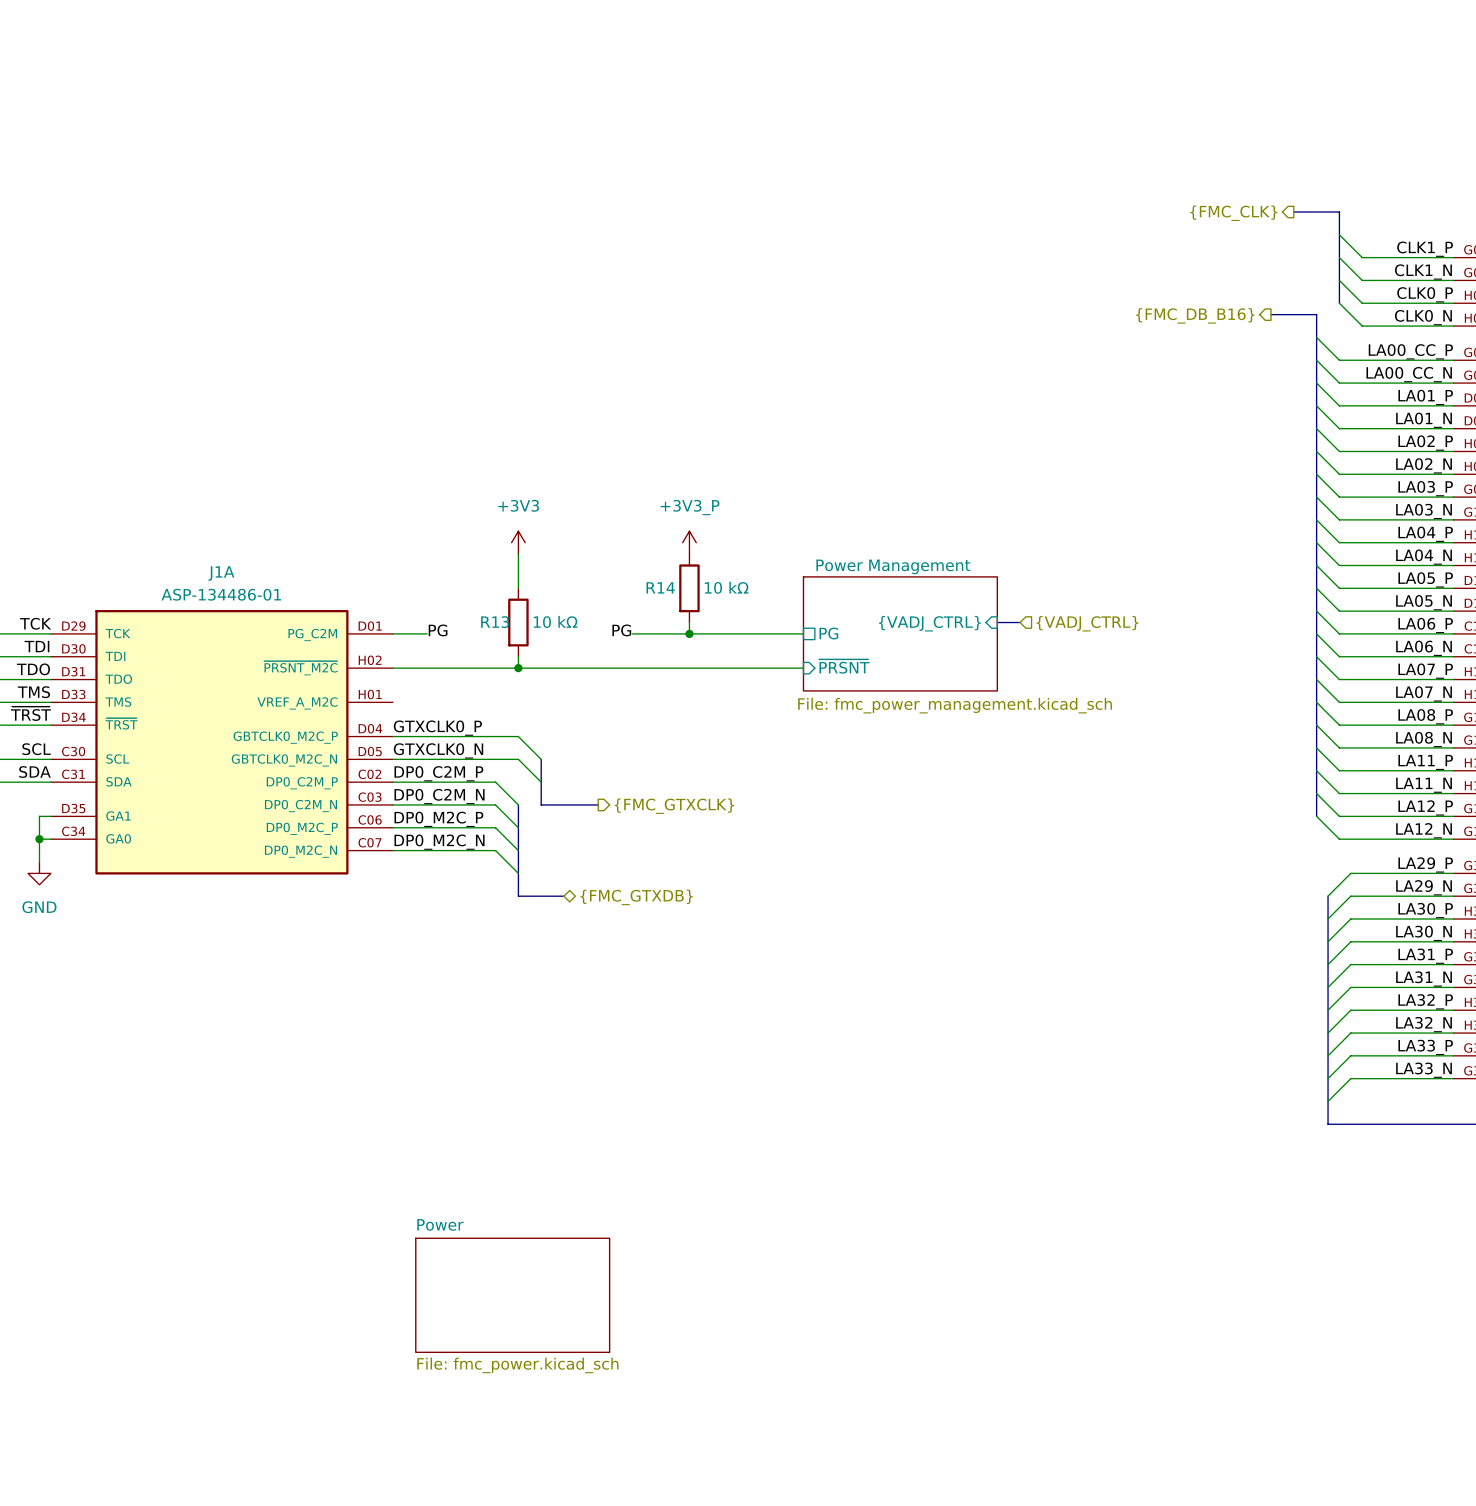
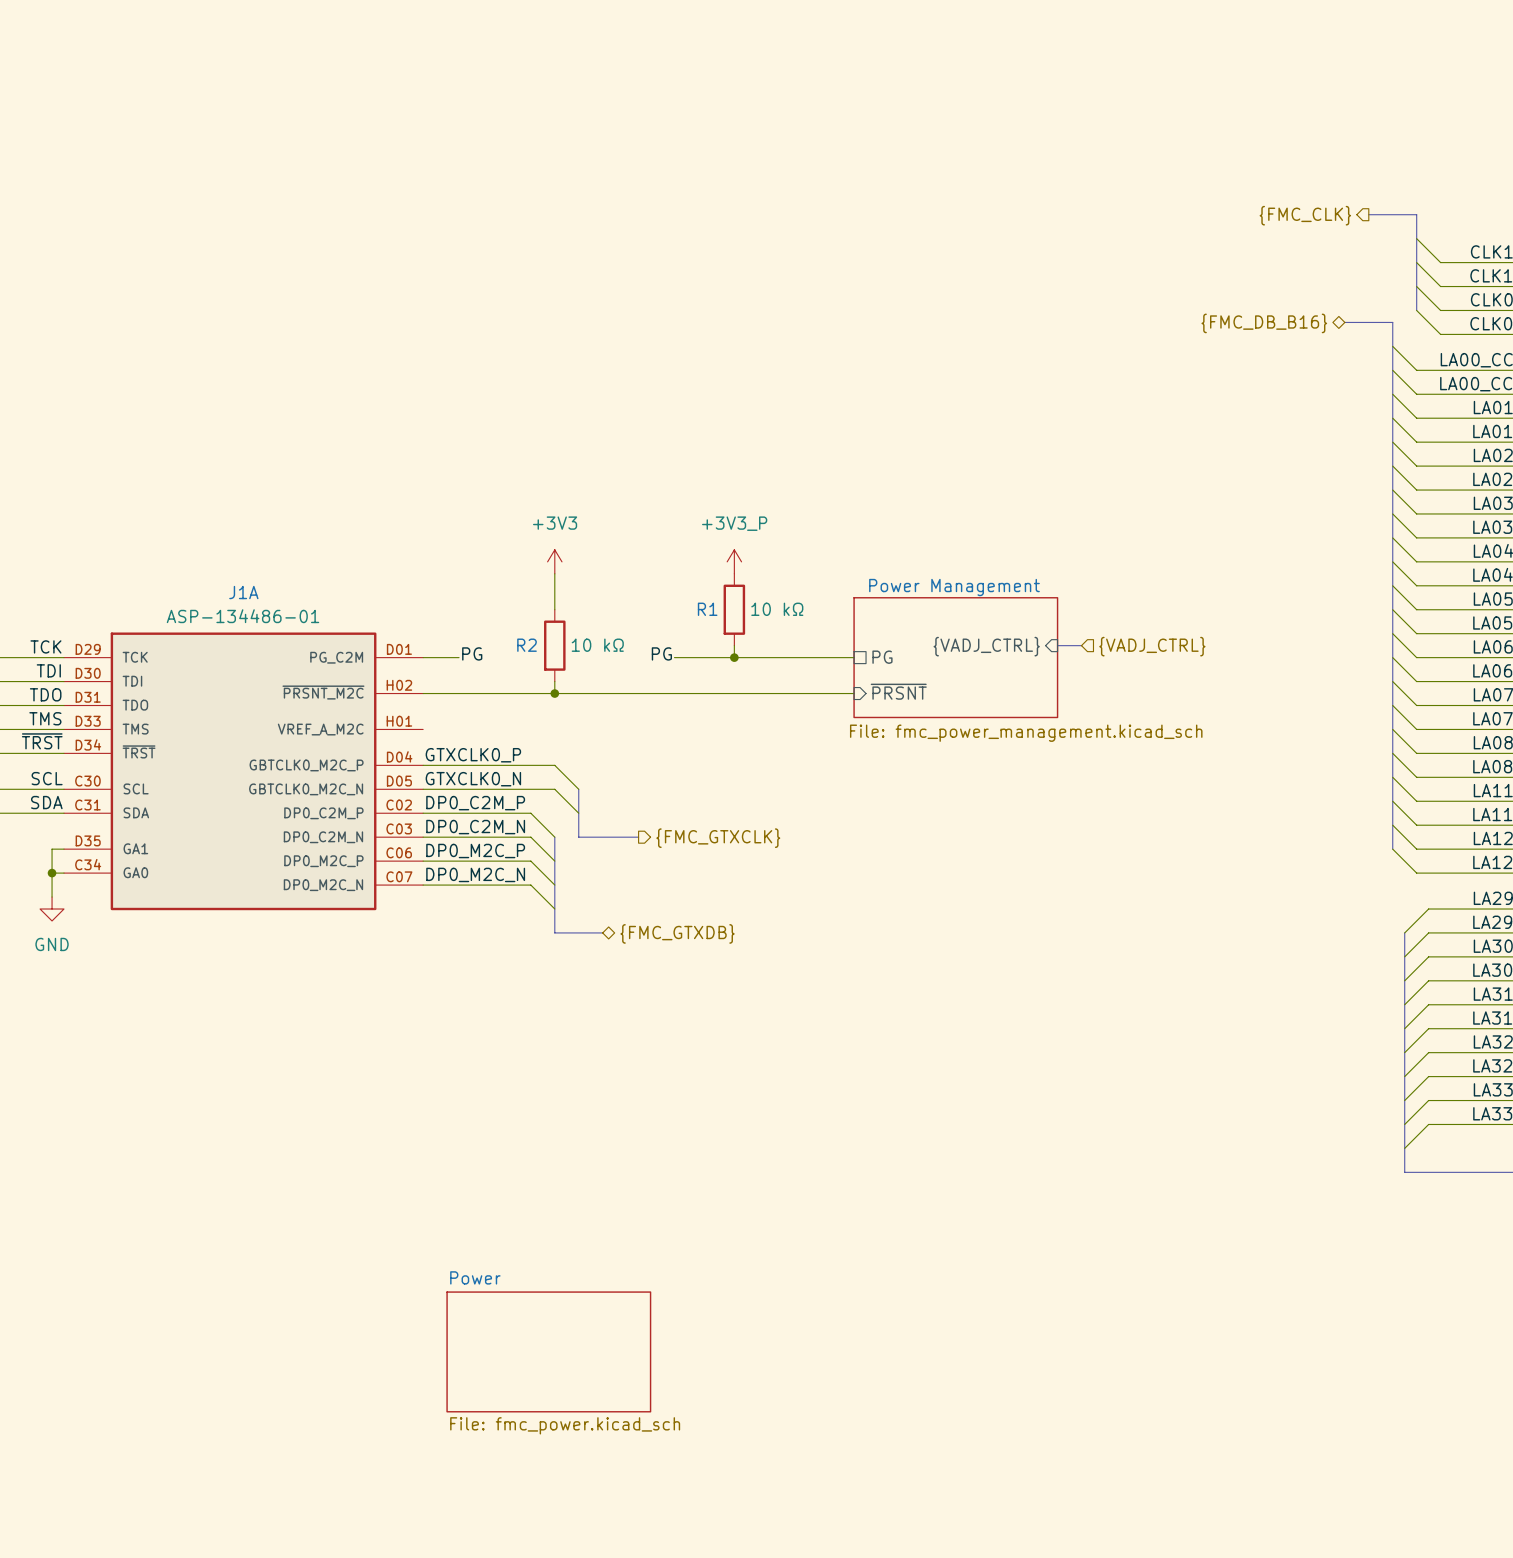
hierarchical label shape: output (1195, 315) -> bidirectional (1264, 323)
R14 name: R14 (660, 587) -> R1 (707, 609)
R13 name: R13 (495, 622) -> R2 (527, 645)

